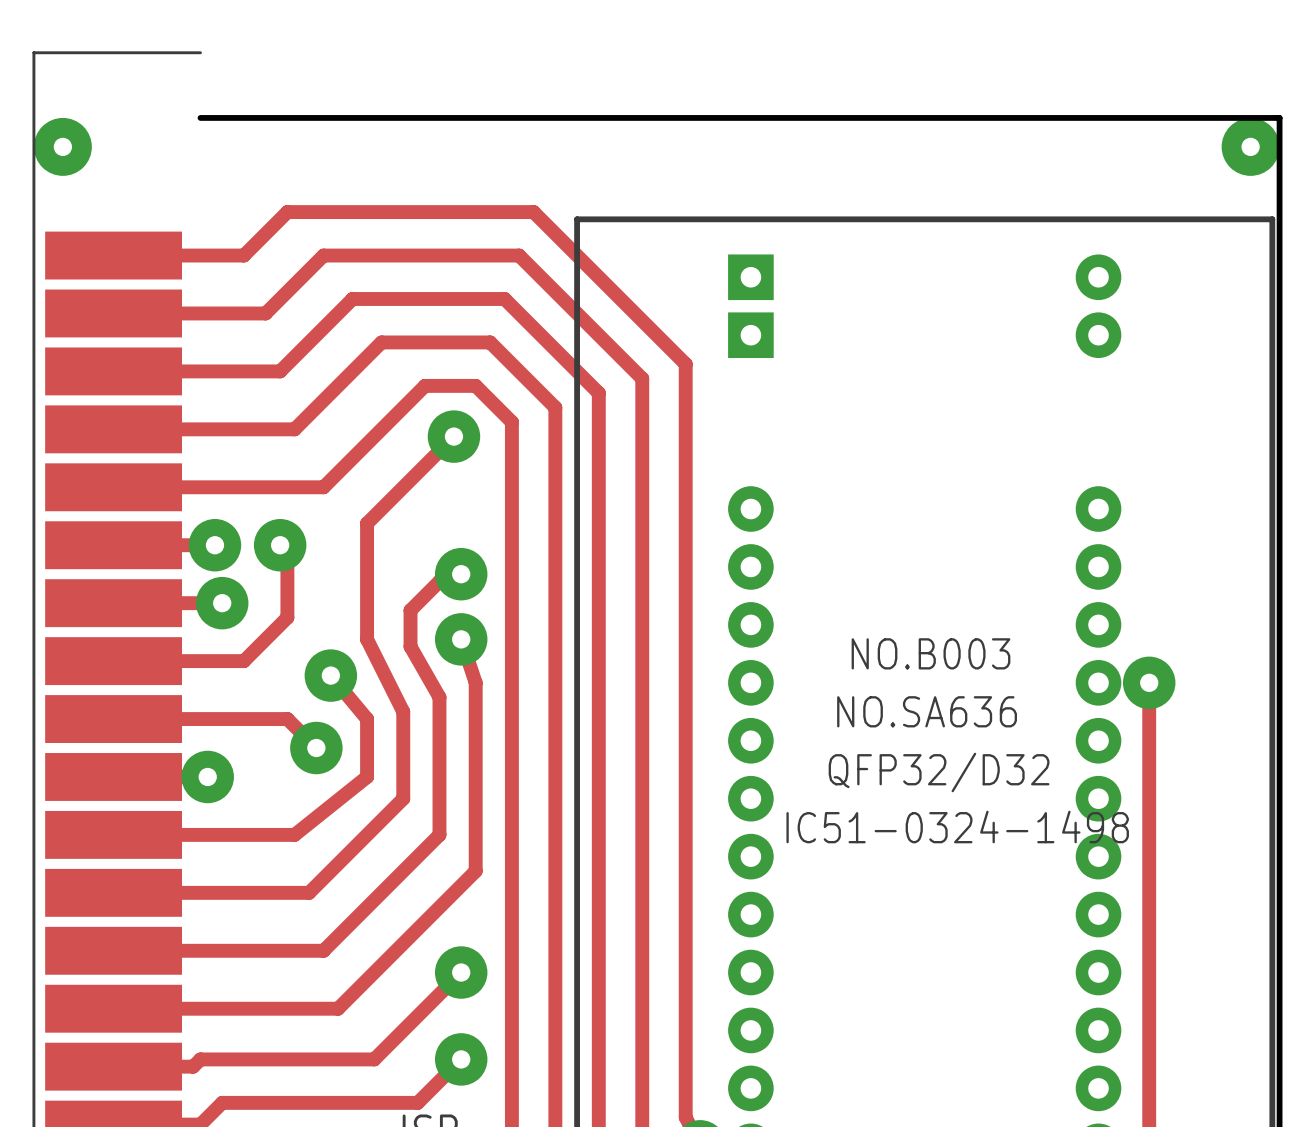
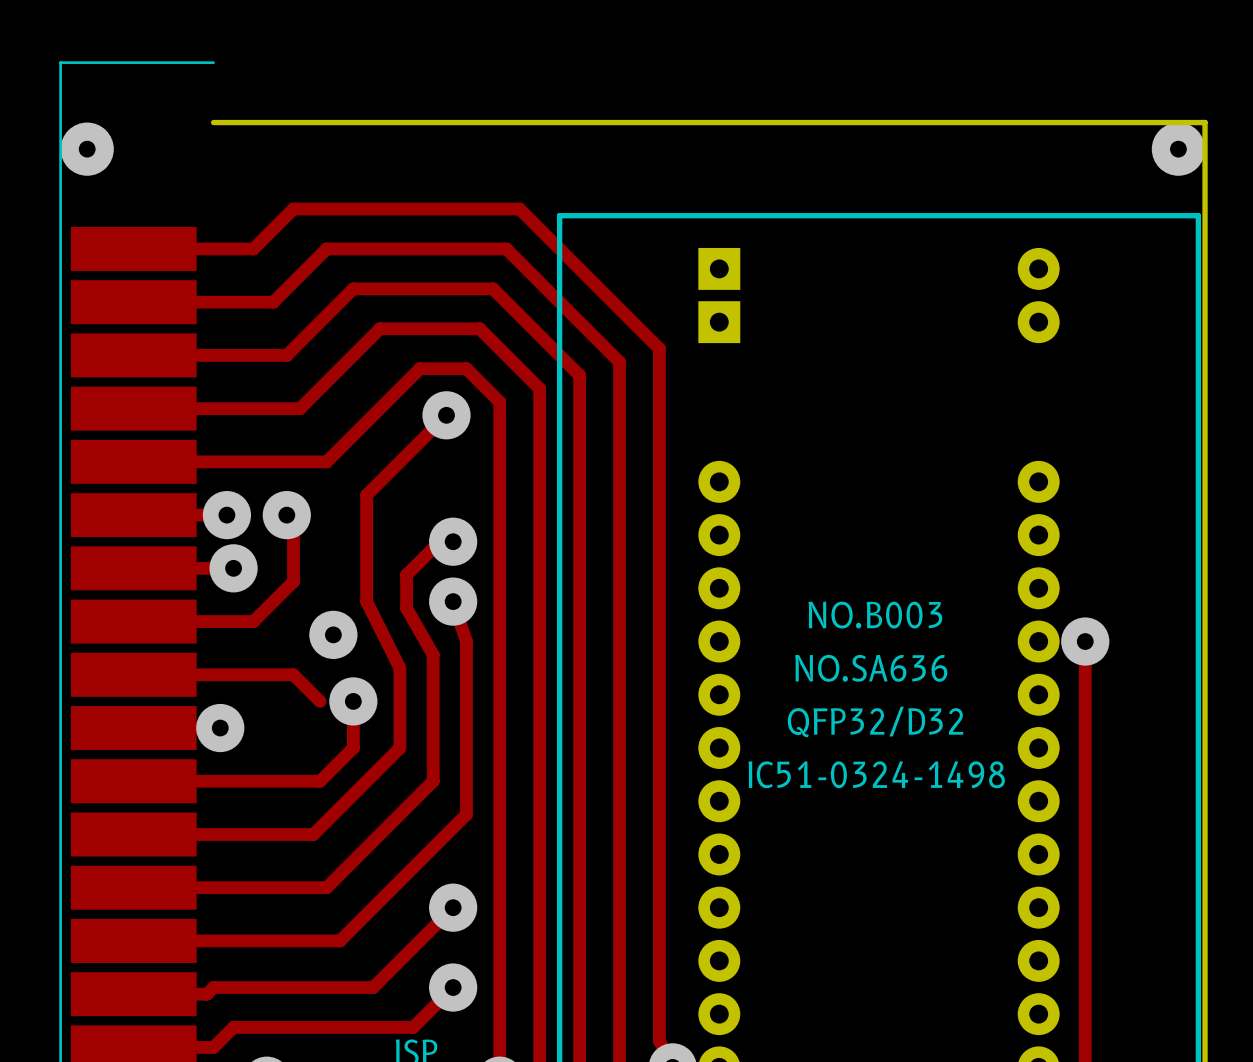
track: (330, 675) (367, 719) (367, 776) (294, 834) -> (353, 701) (353, 747) (320, 781) (300, 781)
via position: (316, 748) -> (353, 701)

